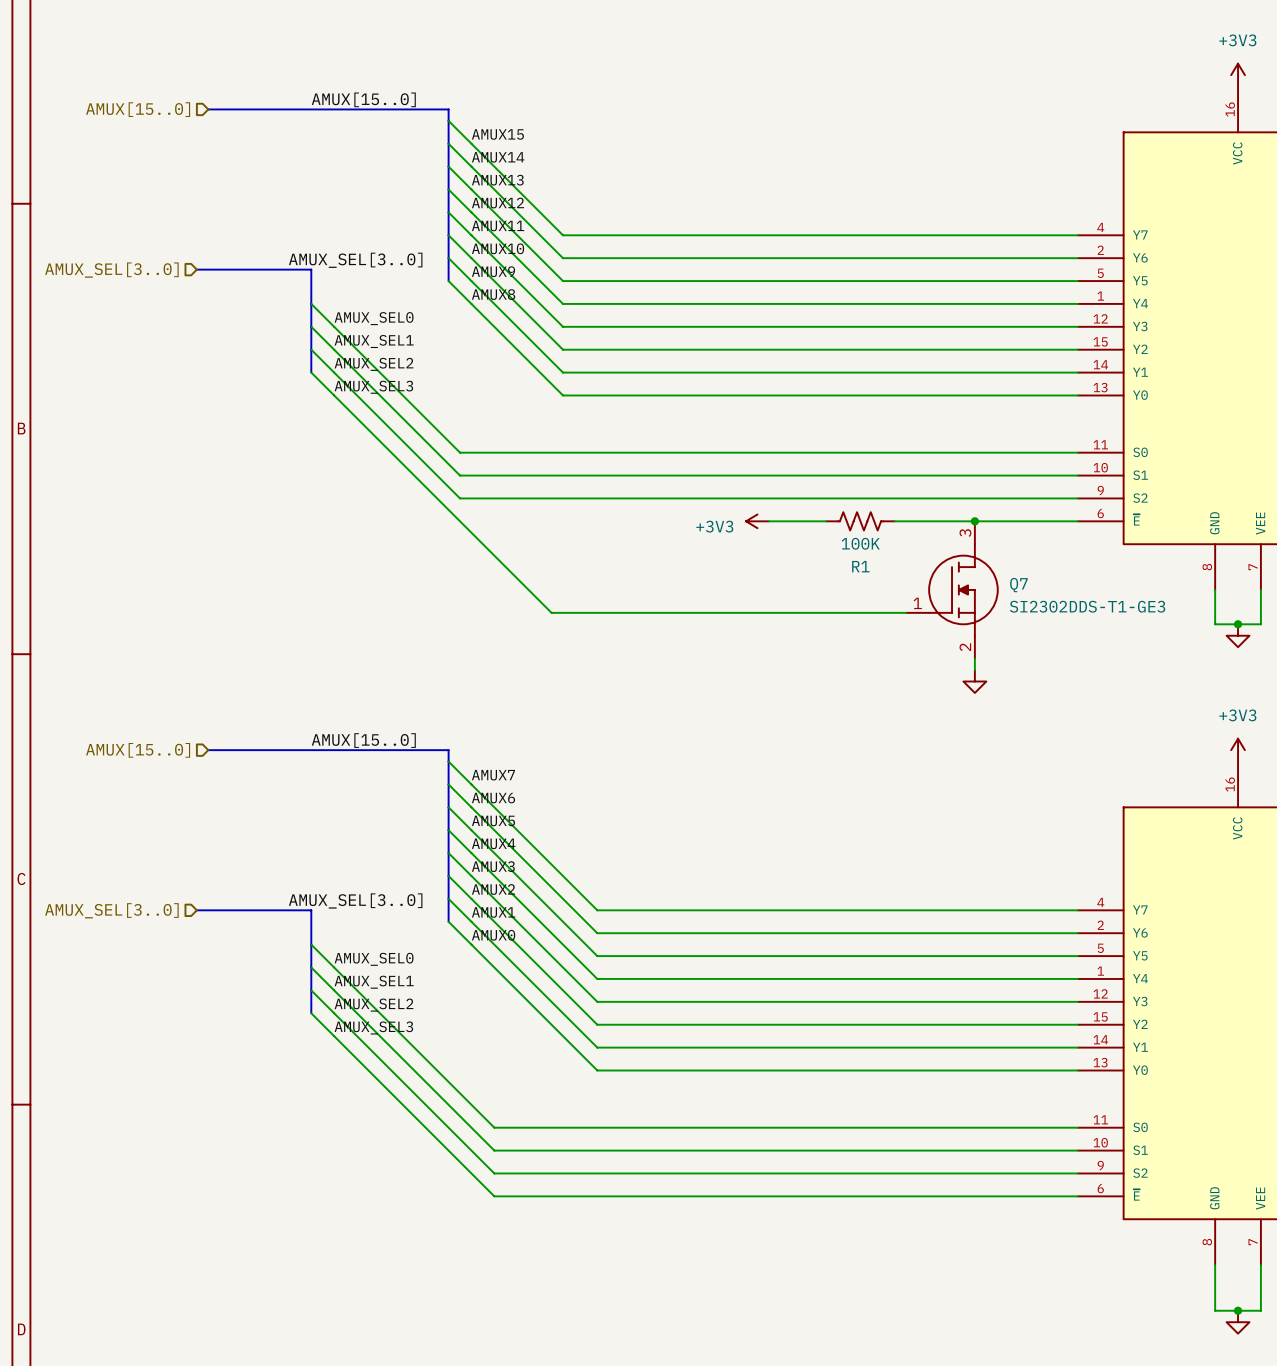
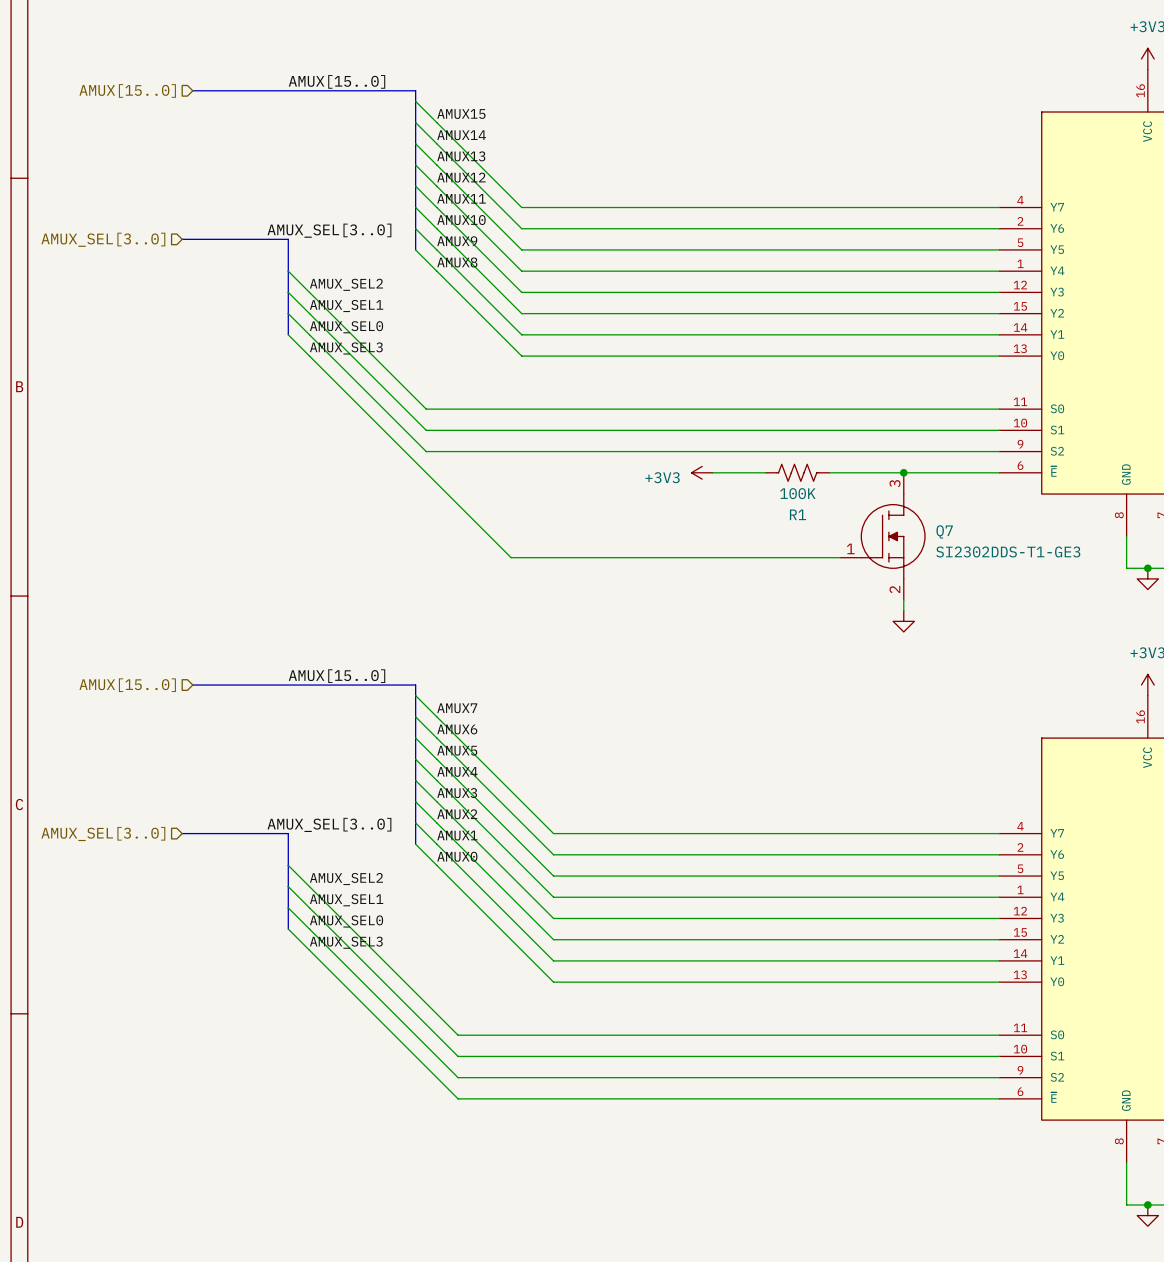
label: AMUX_SEL0 (374, 318) -> AMUX_SEL2 (346, 284)
label: AMUX_SEL2 (374, 364) -> AMUX_SEL0 (346, 327)
label: AMUX_SEL0 (374, 959) -> AMUX_SEL2 (346, 879)
label: AMUX_SEL2 (374, 1005) -> AMUX_SEL0 (346, 921)

